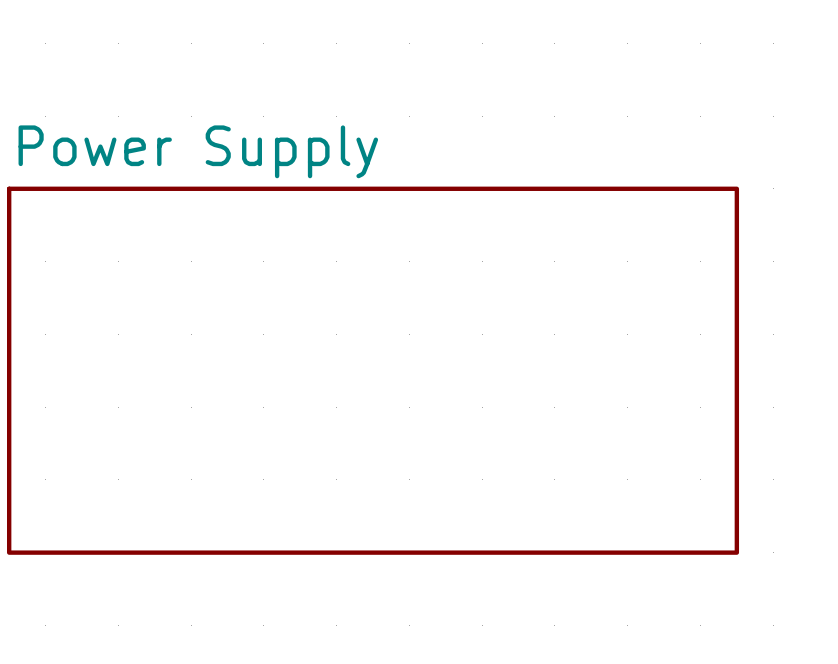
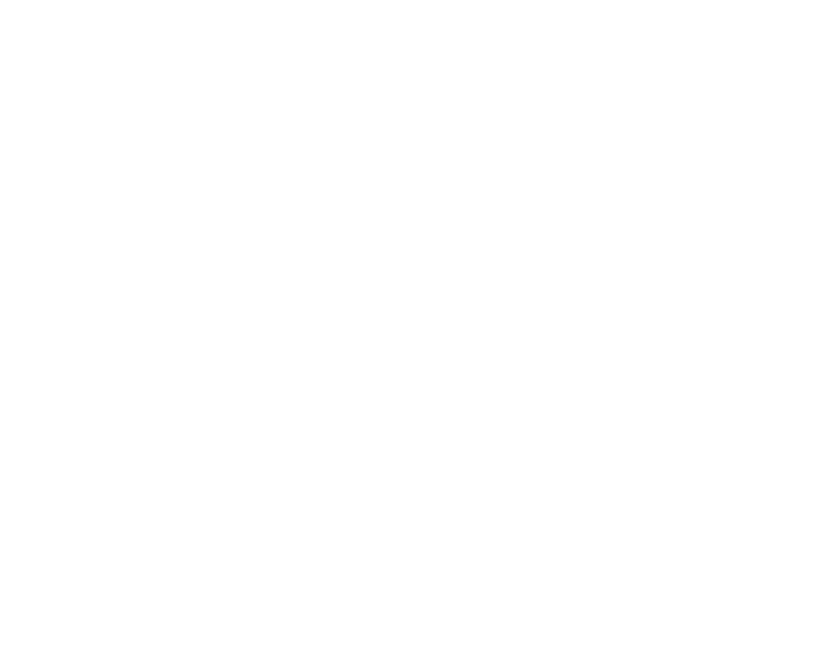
sheet Power Supply: (373, 370) -> none

